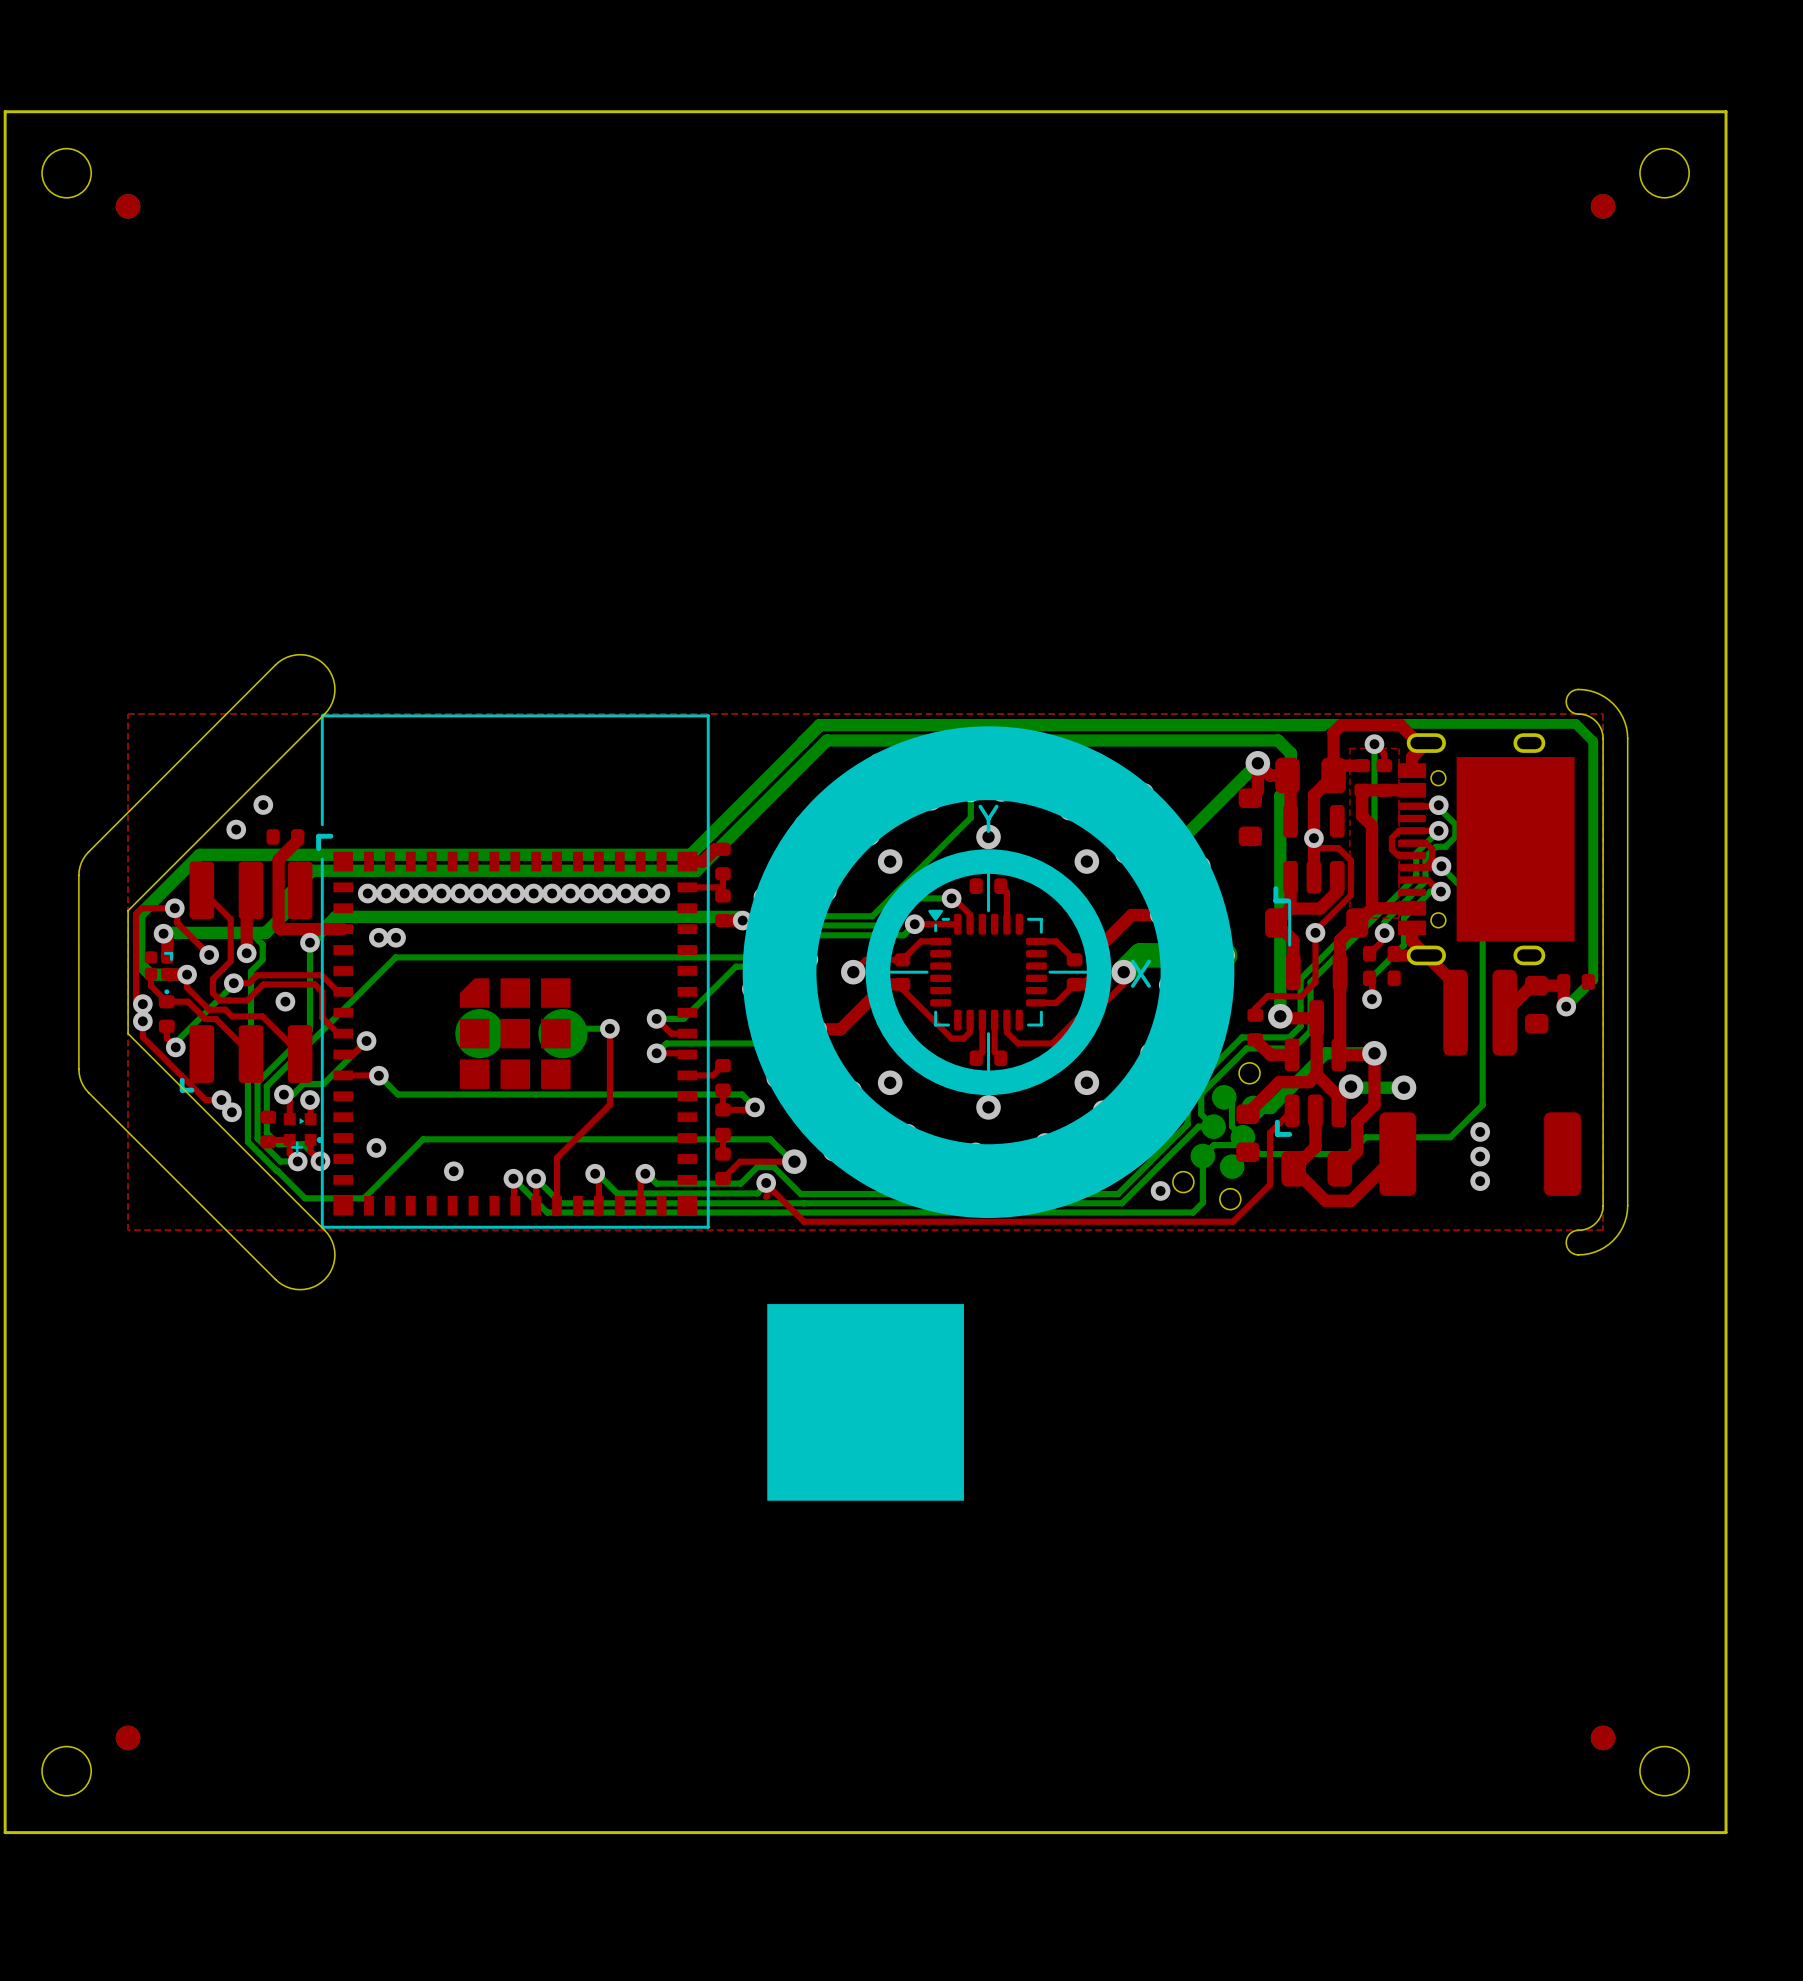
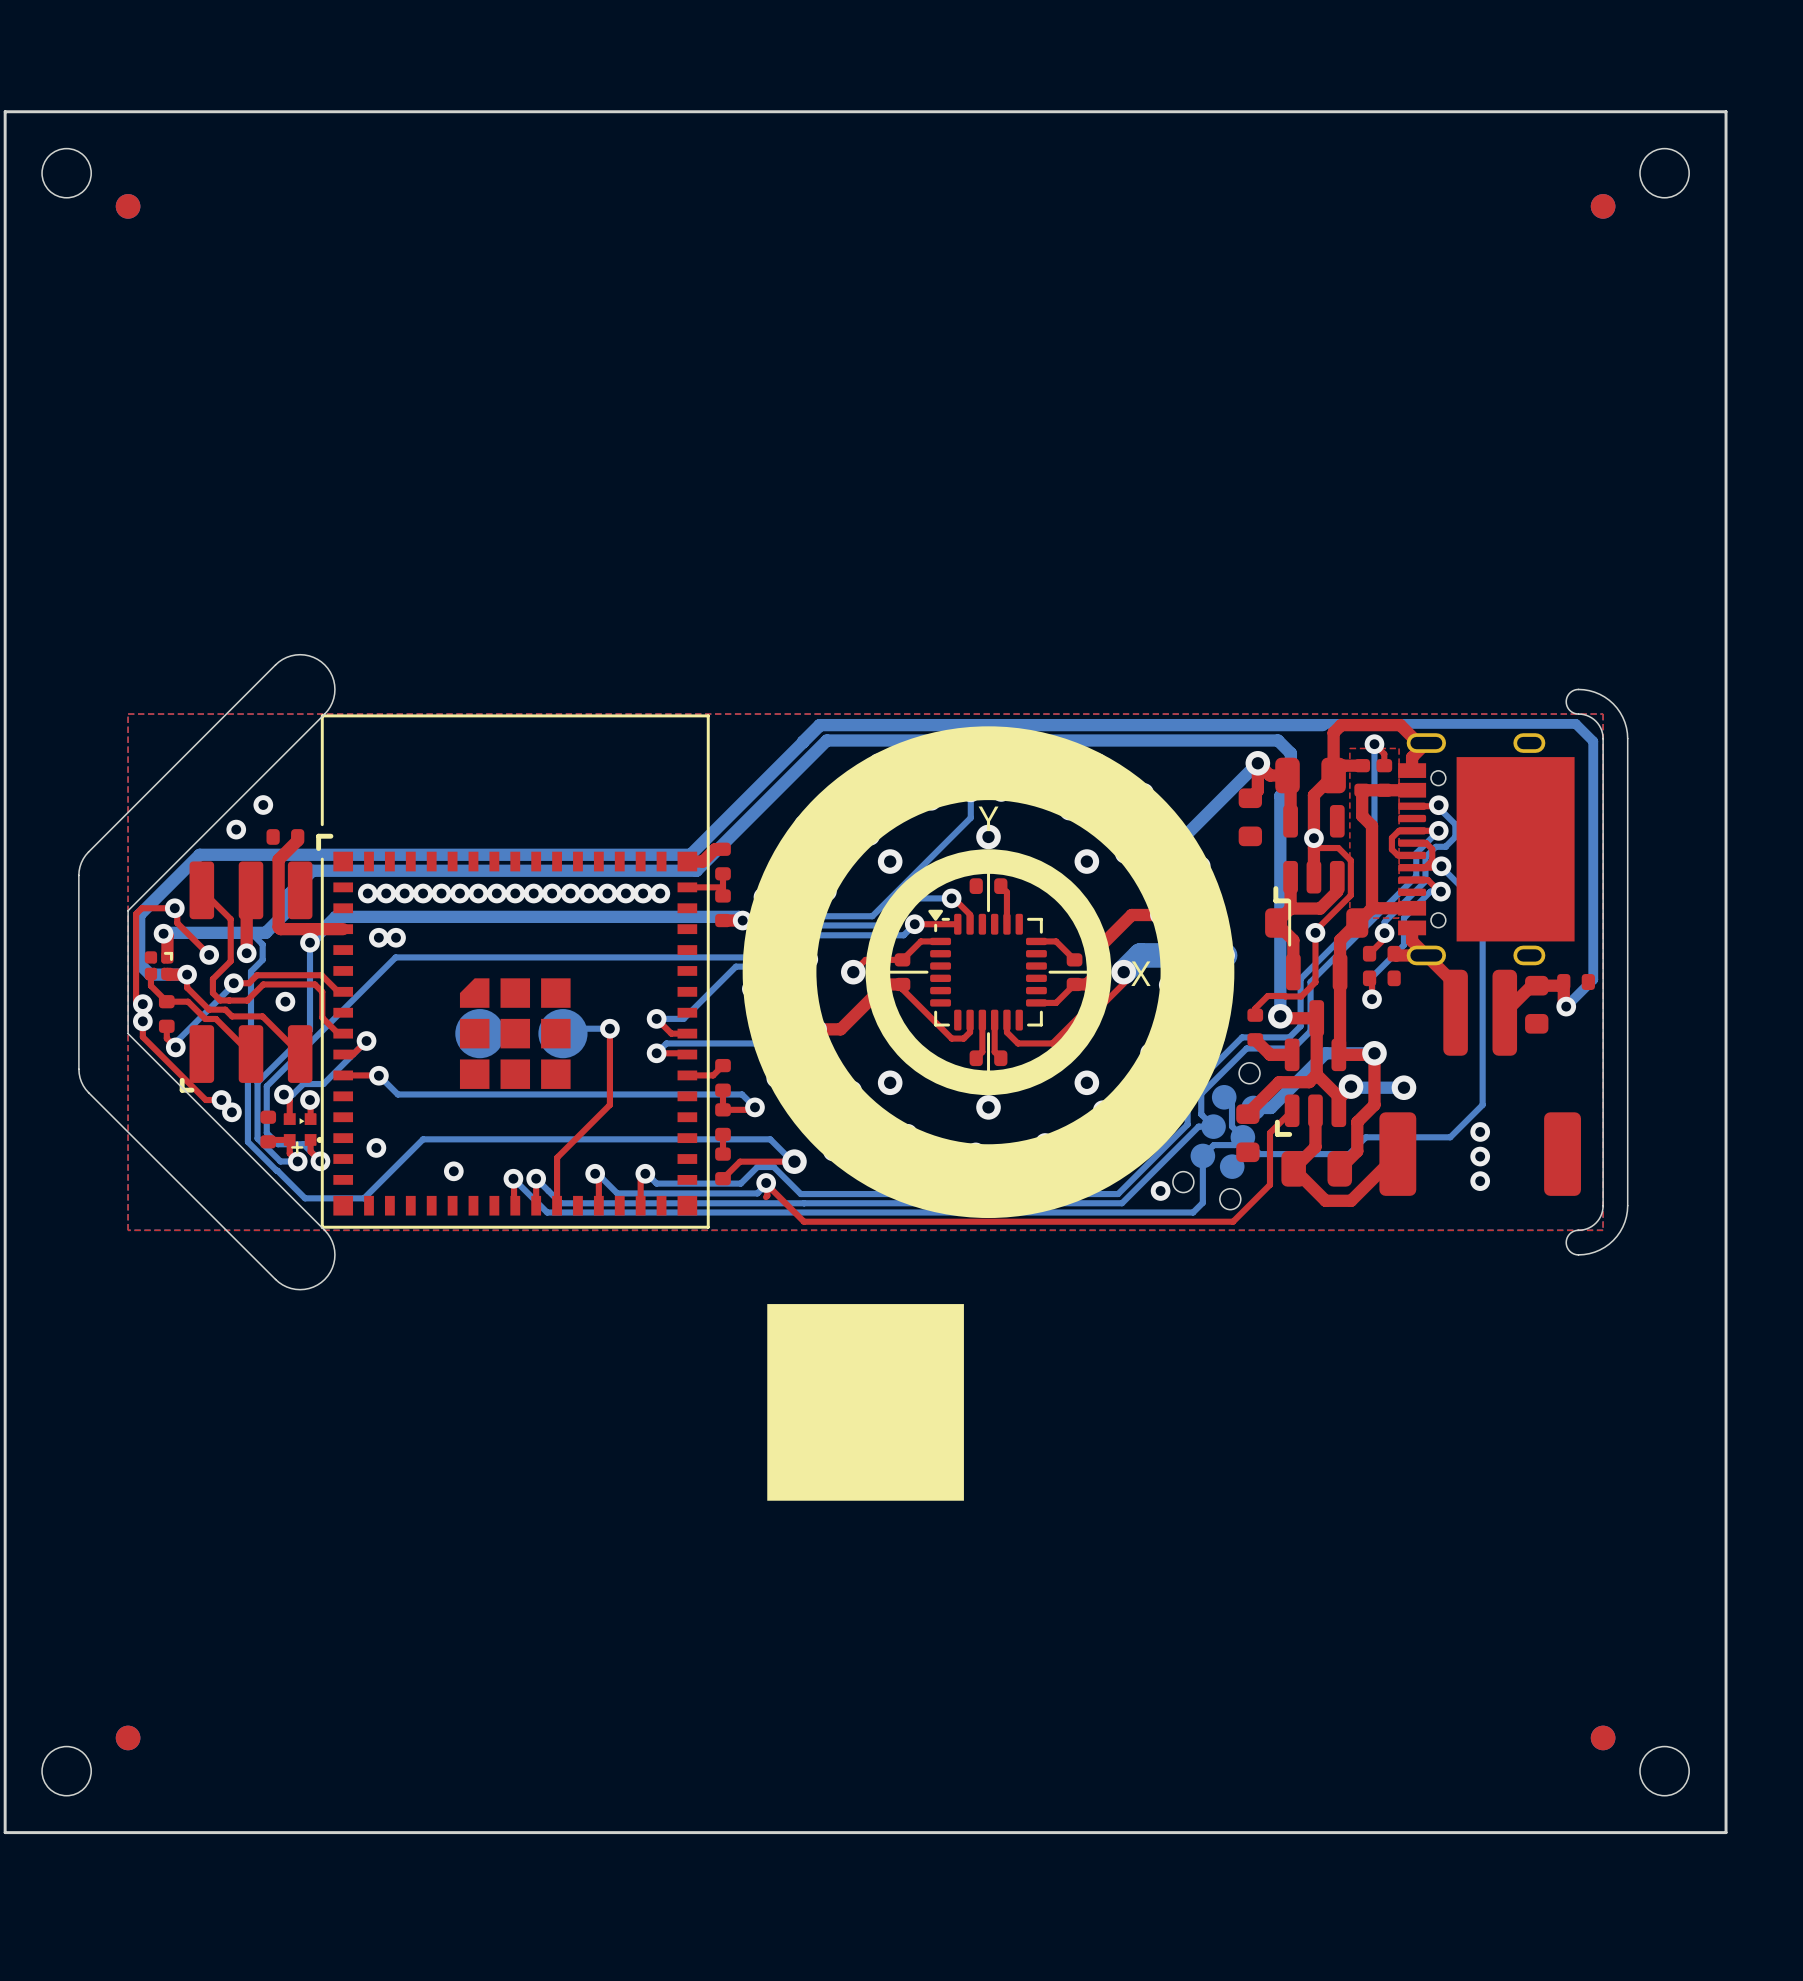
part footprint: [158, 989, 175, 1033] -> [158, 995, 175, 1033]

